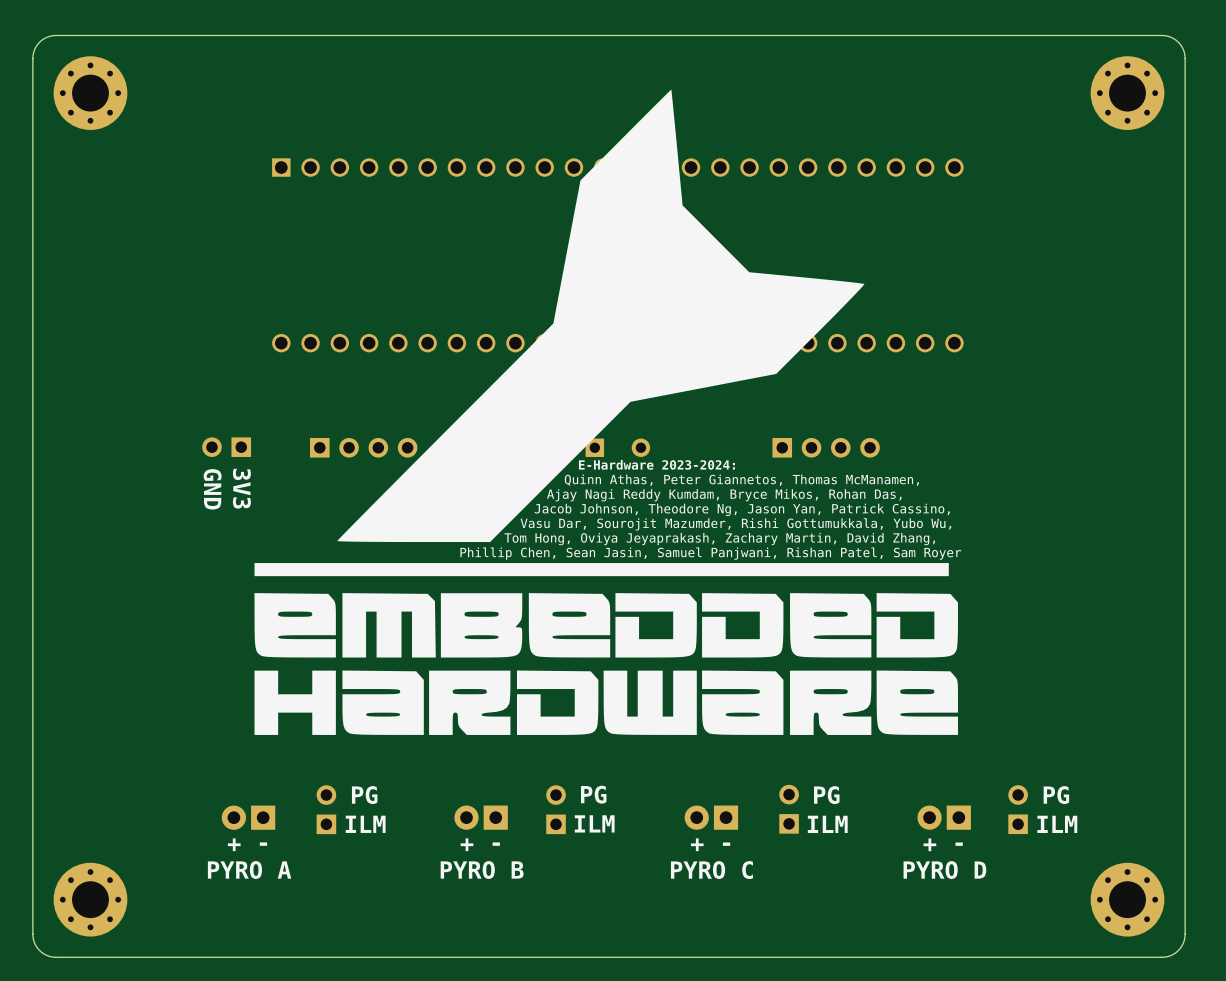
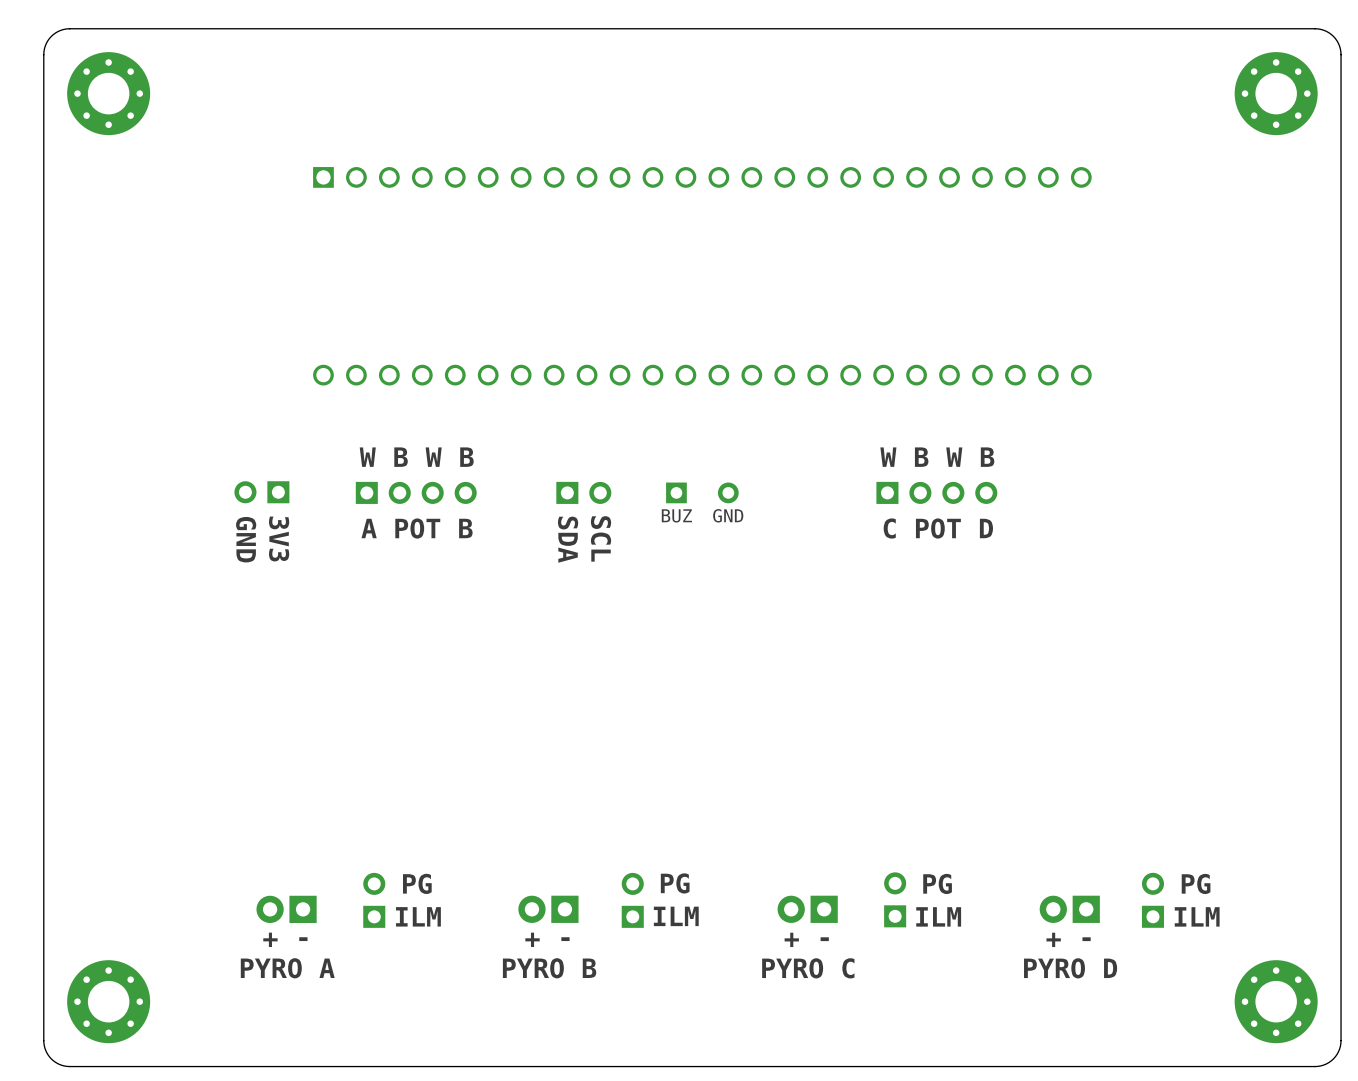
drawing: [254, 89, 958, 735] -> none
text: none -> W (367, 457)
text: none -> B (401, 457)
text: none -> W (433, 457)
text: none -> B (466, 457)
text: none -> W (888, 457)
text: none -> B (921, 457)
text: none -> W (954, 457)
text: none -> B (987, 457)
text: E-Hardware 2023-2024: (656, 464) -> none
text: none -> BUZ (676, 515)
text: none -> GND (728, 515)
text: none -> A POT B (417, 528)
text: none -> C POT D (938, 528)
text: Quinn Athas, Peter Giannetos, Thomas McManamen, (741, 480) -> none
text: none -> SCL (601, 538)
text: none -> SDA (568, 539)
text: Ajay Nagi Reddy Kumdam, Bryce Mikos, Rohan Das, (724, 495) -> none
text: Jacob Johnson, Theodore Ng, Jason Yan, Patrick Cassino, (742, 509) -> none
text: Vasu Dar, Sourojit Mazumder, Rishi Gottumukkala, Yubo Wu, (735, 524) -> none
text: Tom Hong, Oviya Jeyaprakash, Zachary Martin, David Zhang, (719, 539) -> none
text: Phillip Chen, Sean Jasin, Samuel Panjwani, Rishan Patel, Sam Royer (710, 553) -> none

